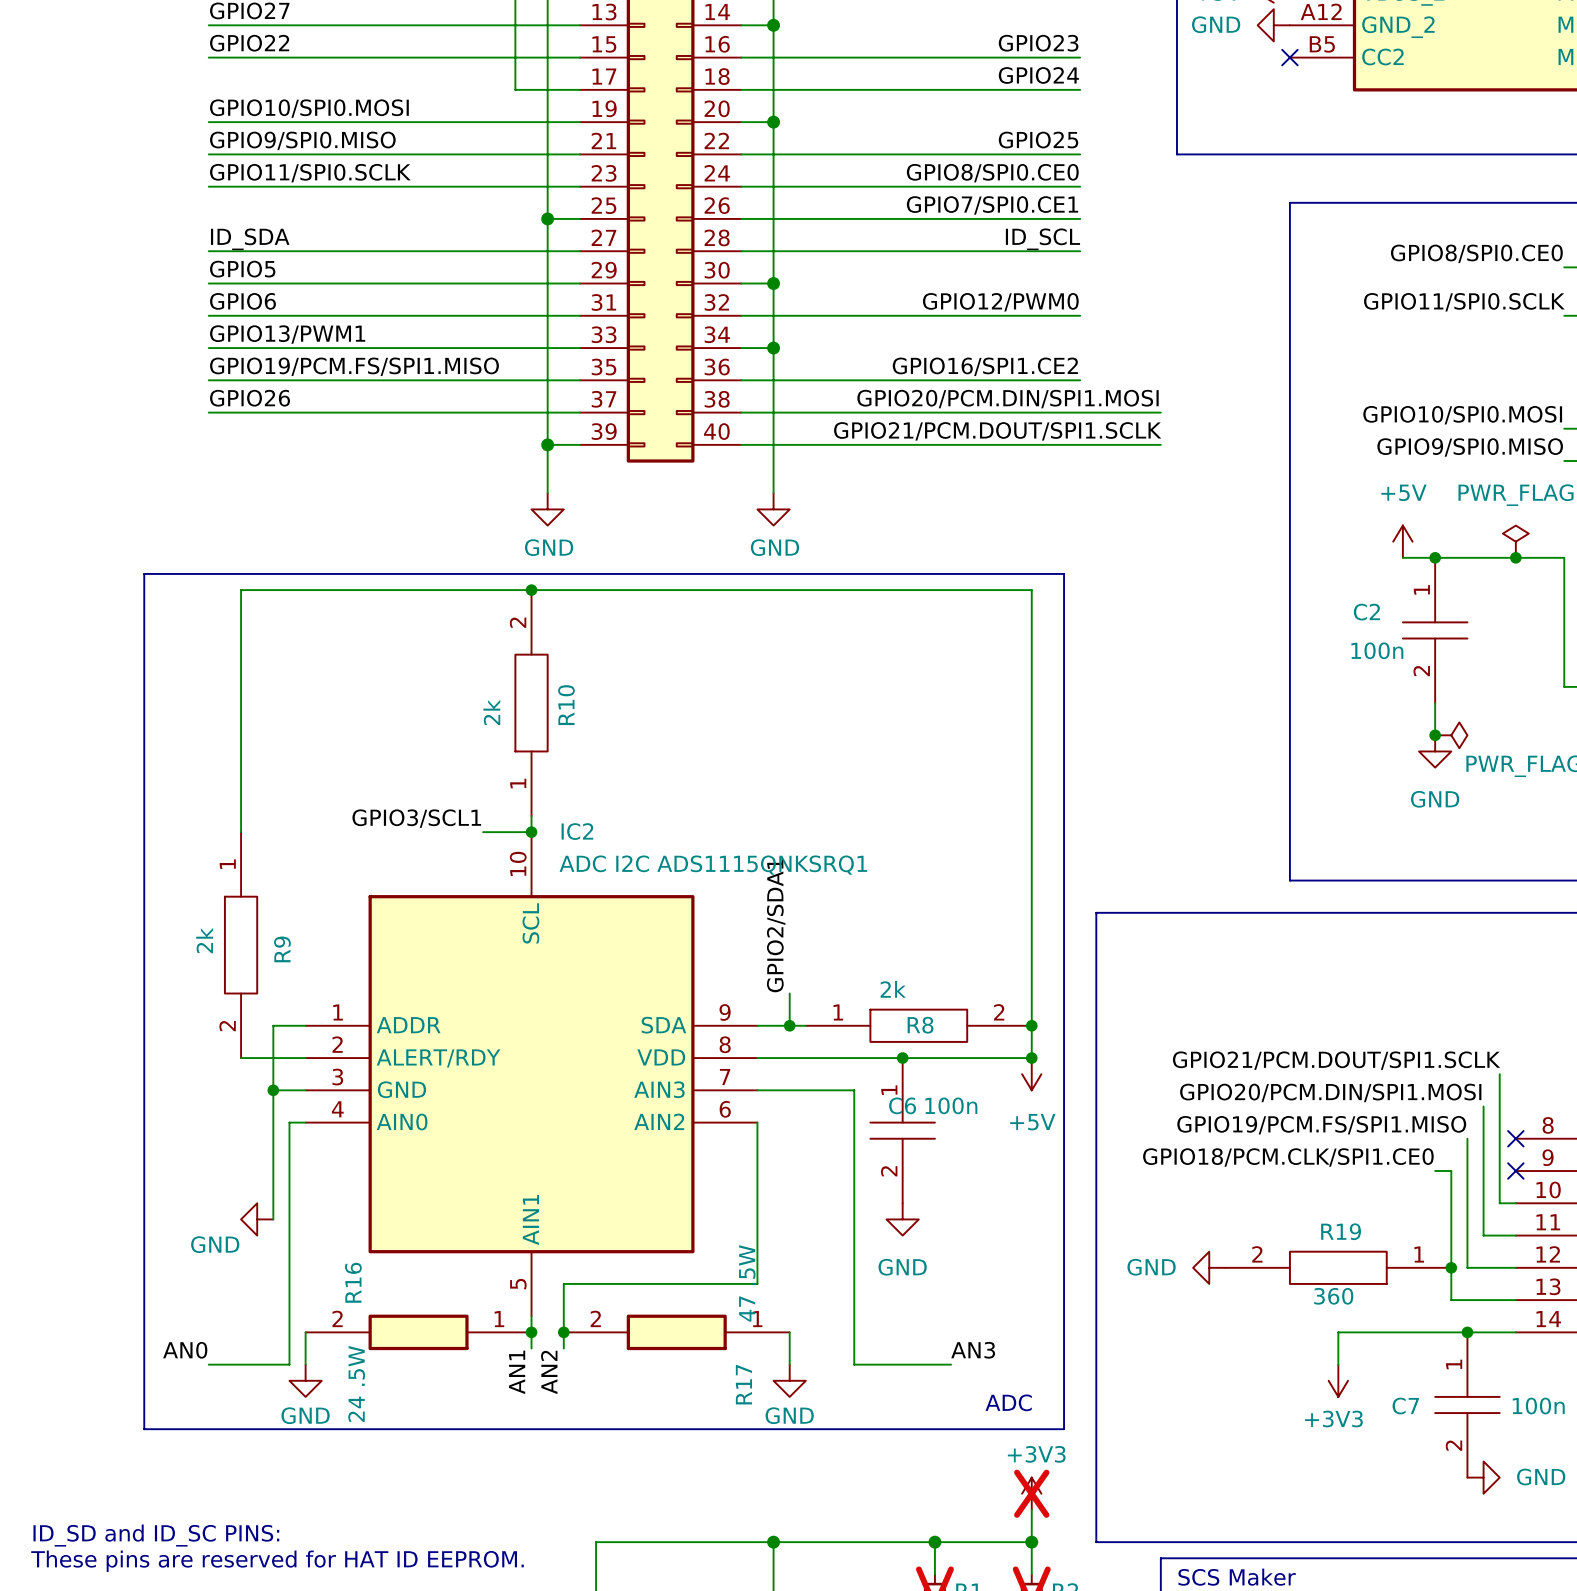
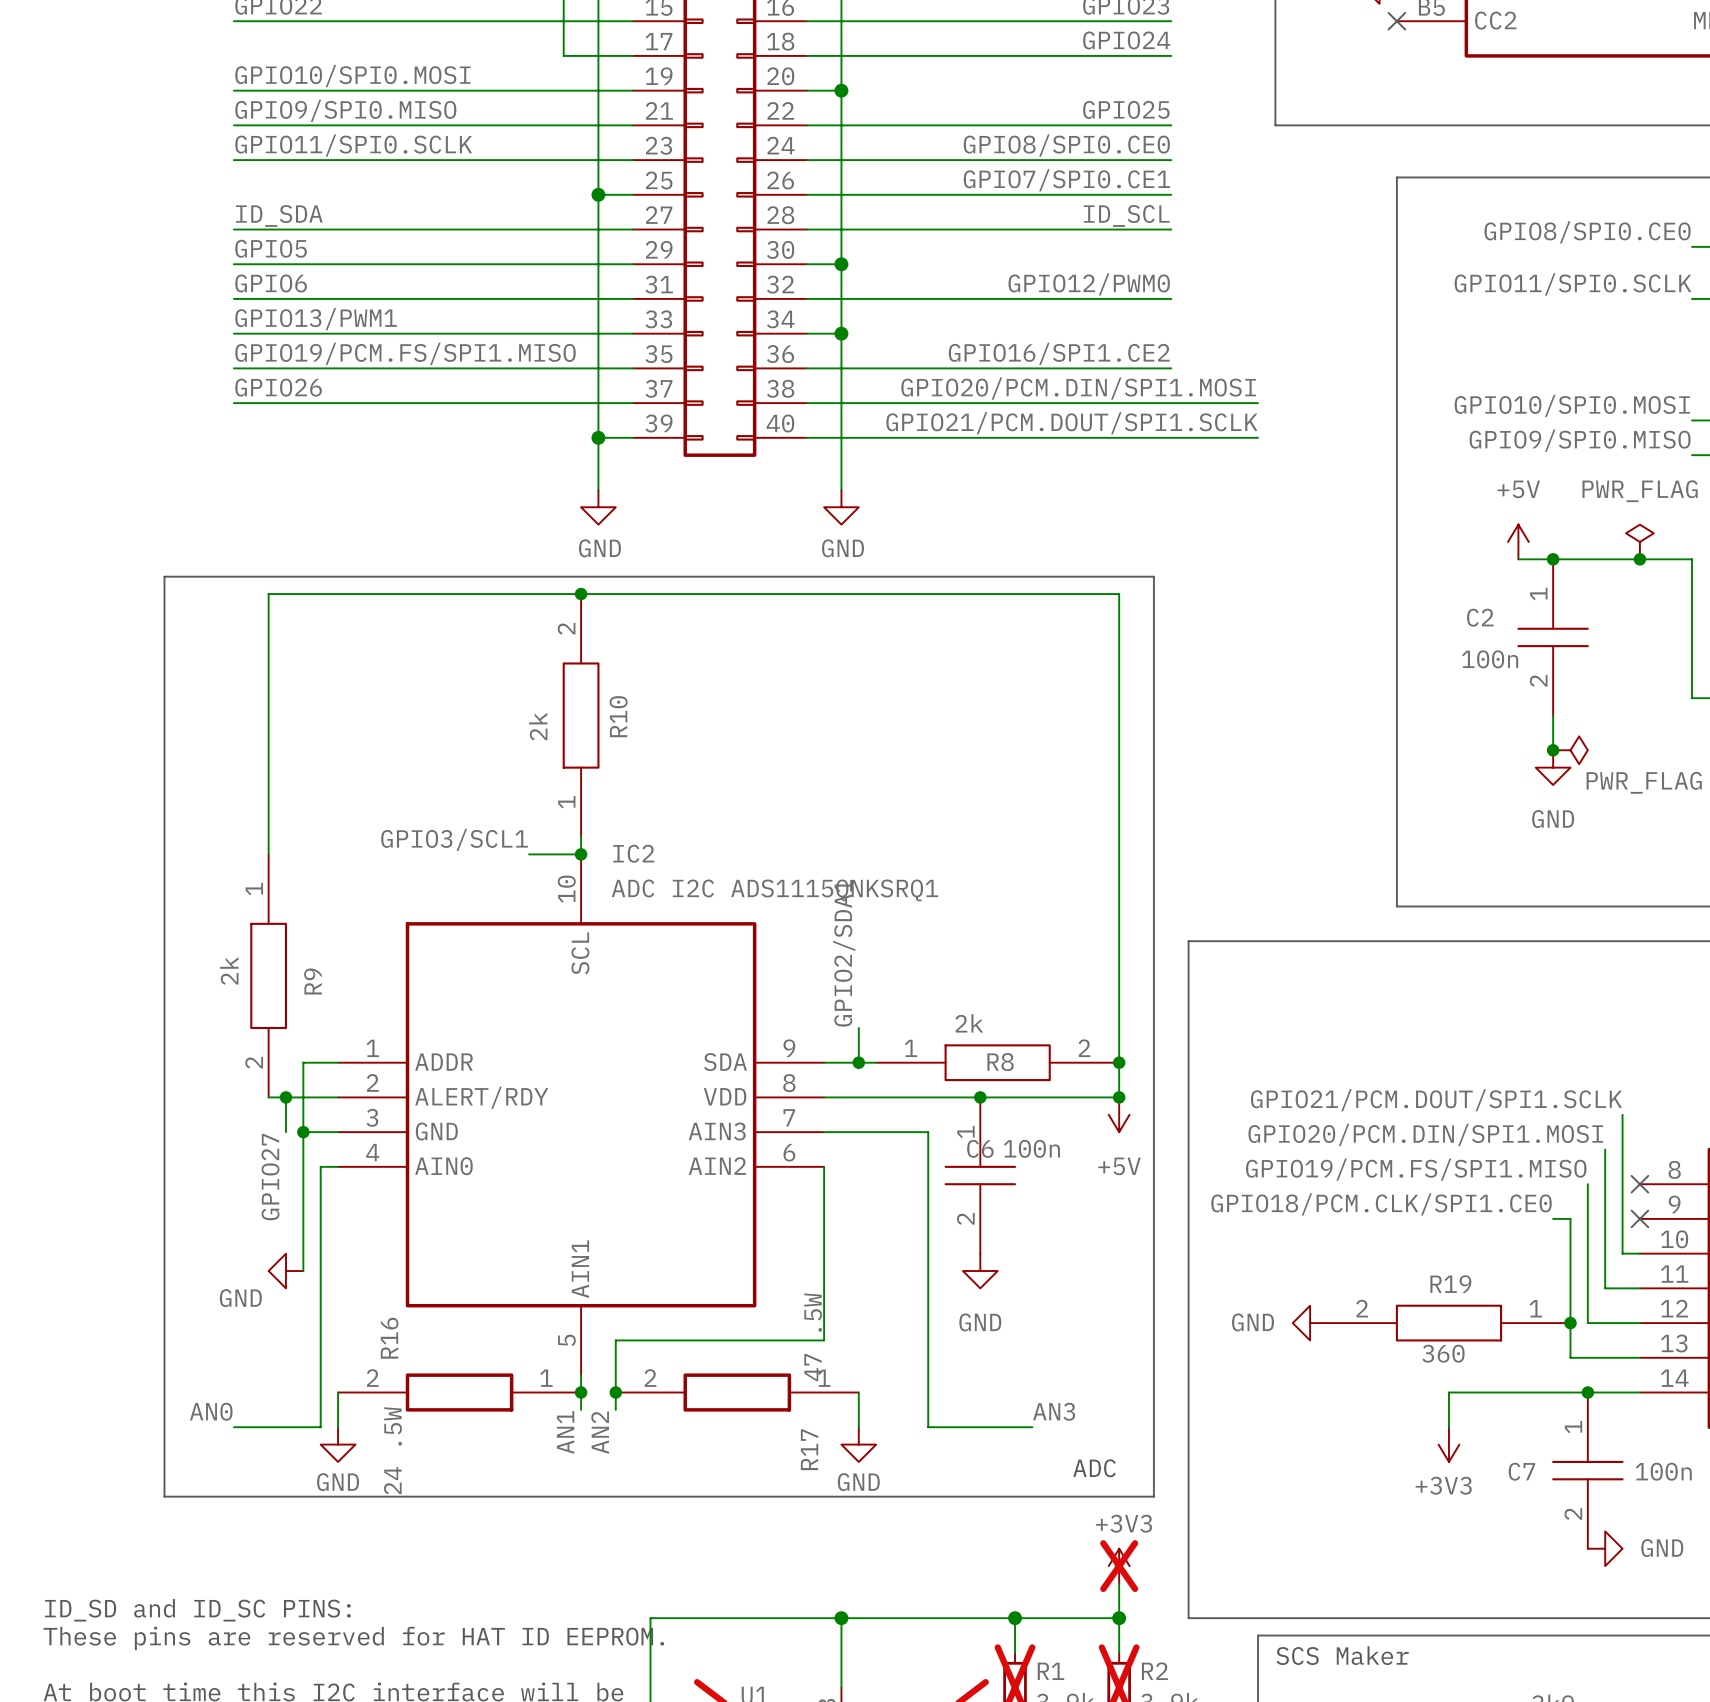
wire: none -> (285, 1097) (285, 1132)
junction: none -> (285, 1097)
label: none -> GPIO27 (270, 1177)

